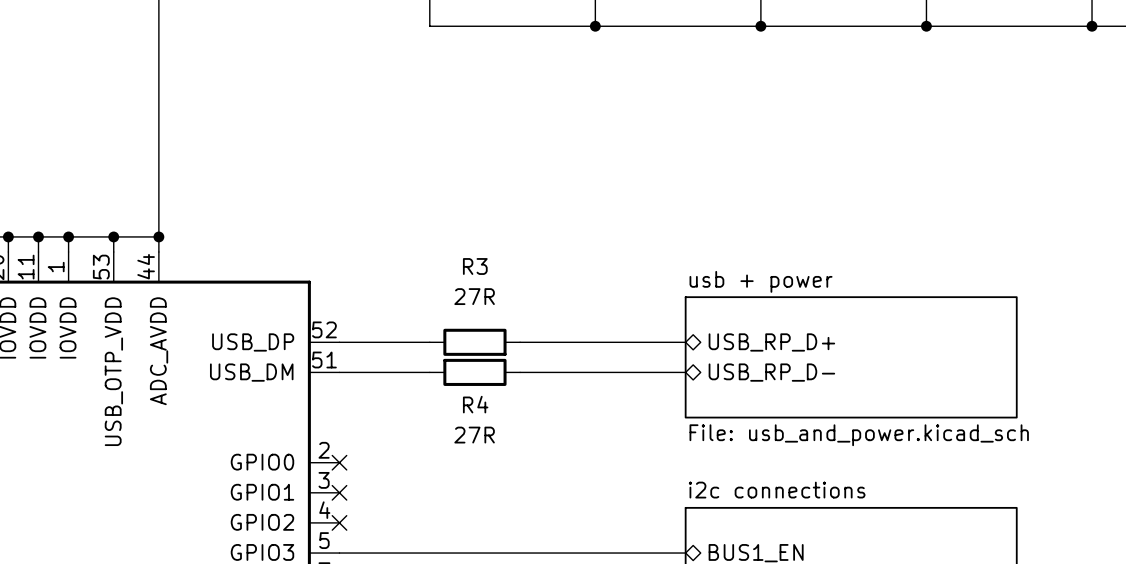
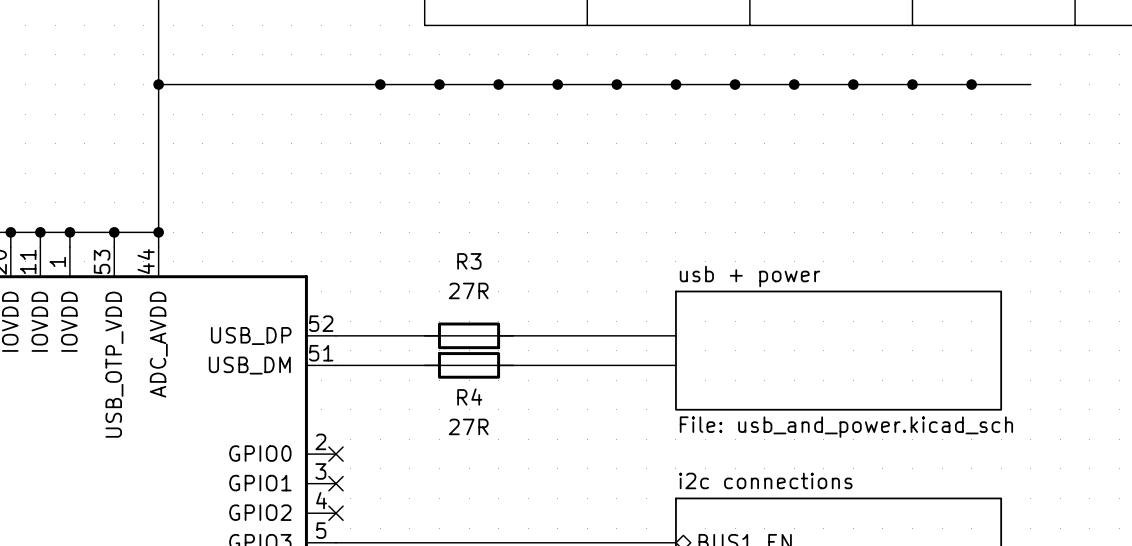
junction: (595, 26) -> none
junction: (760, 26) -> none
junction: (926, 26) -> none
junction: (1092, 26) -> none
wire: none -> (158, 84) (1030, 84)
junction: none -> (158, 84)
junction: none -> (380, 84)
junction: none -> (439, 84)
junction: none -> (498, 84)
junction: none -> (557, 84)
junction: none -> (616, 84)
junction: none -> (675, 84)
junction: none -> (735, 84)
junction: none -> (794, 84)
junction: none -> (853, 84)
junction: none -> (912, 84)
junction: none -> (971, 84)
wire: none -> (424, 335) (513, 335)
sheet pin: USB_RP_D+ (771, 342) -> none
wire: none -> (424, 365) (513, 365)
sheet pin: USB_RP_D- (771, 372) -> none

